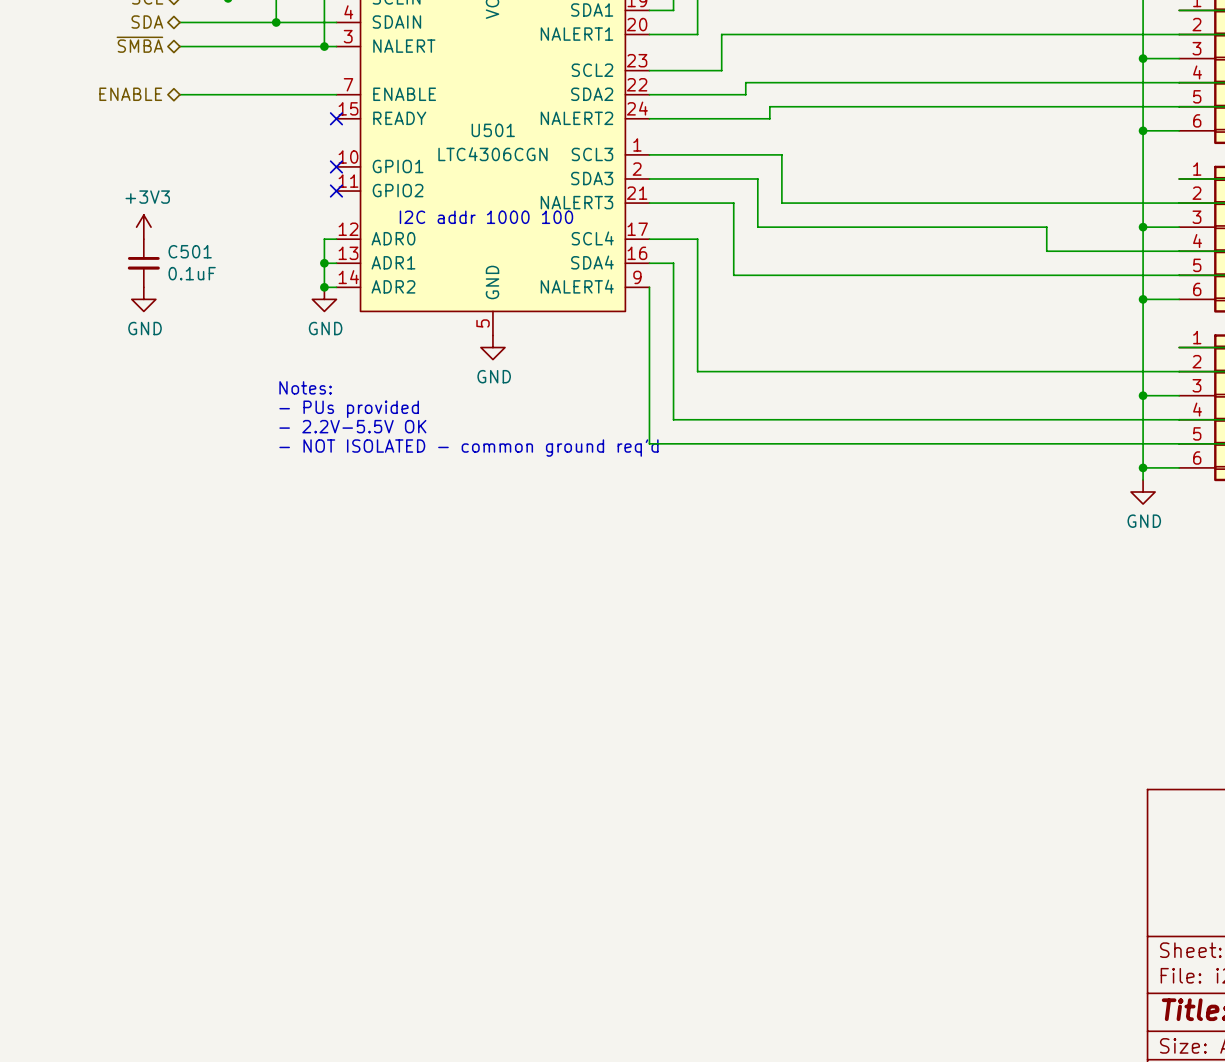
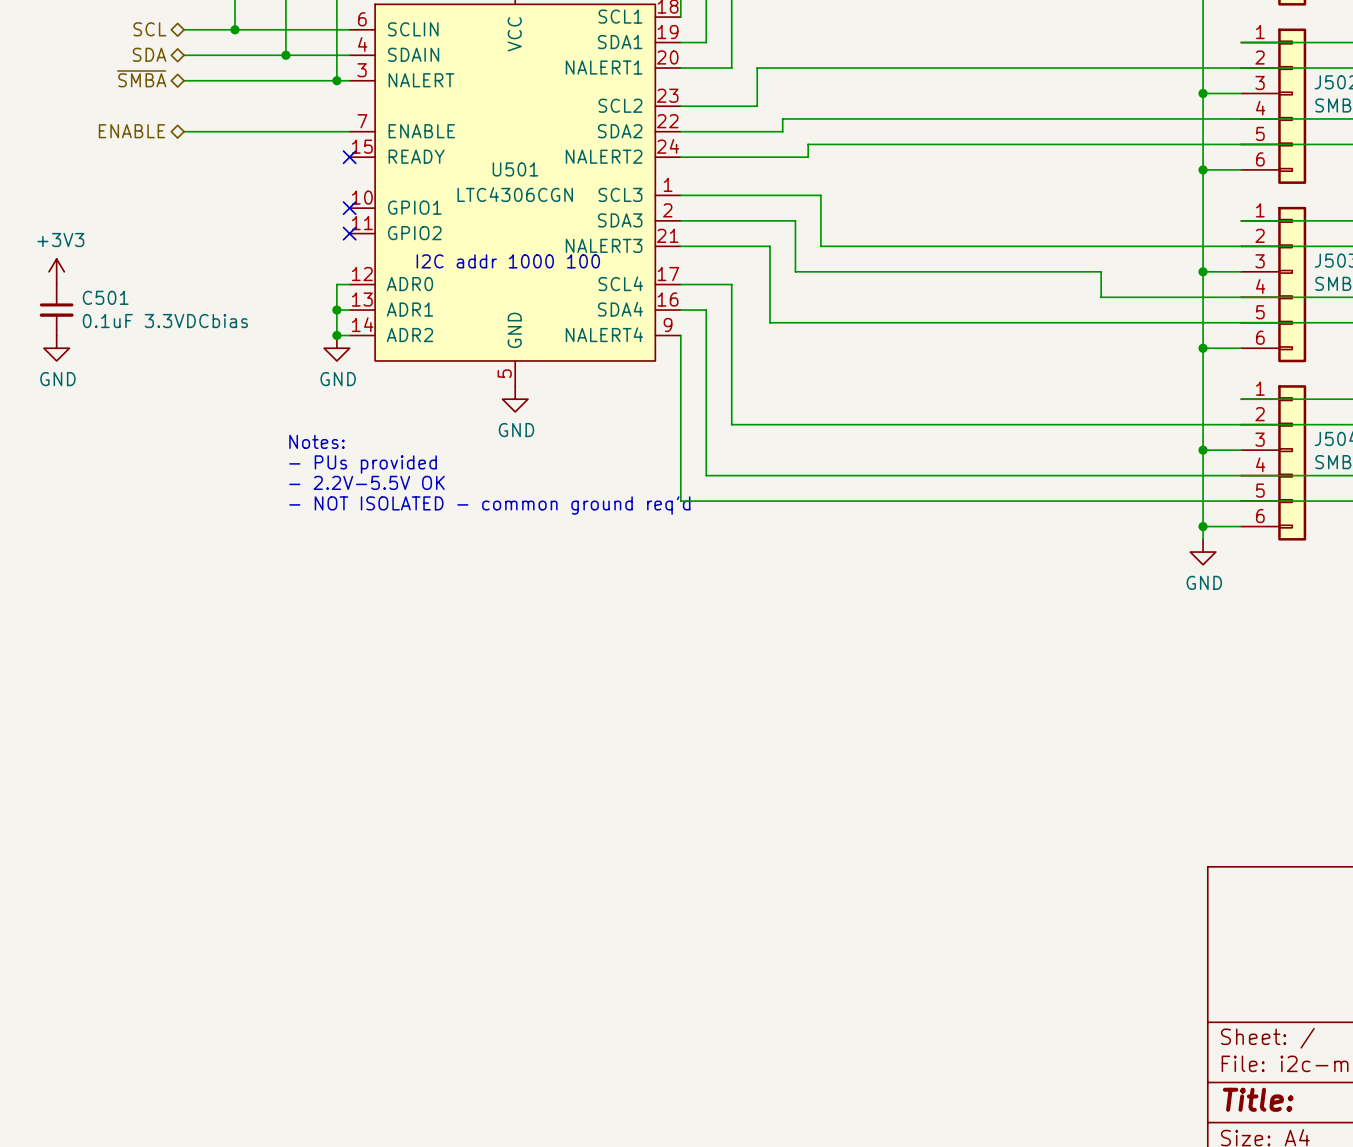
power symbol position: +3V3 (143, 227) -> +3V3 (56, 271)
C501 position: (143, 263) -> (56, 310)
C501 value: 0.1uF (192, 273) -> 0.1uF 3.3VDCbias (165, 321)
power symbol position: GND (143, 299) -> GND (56, 348)

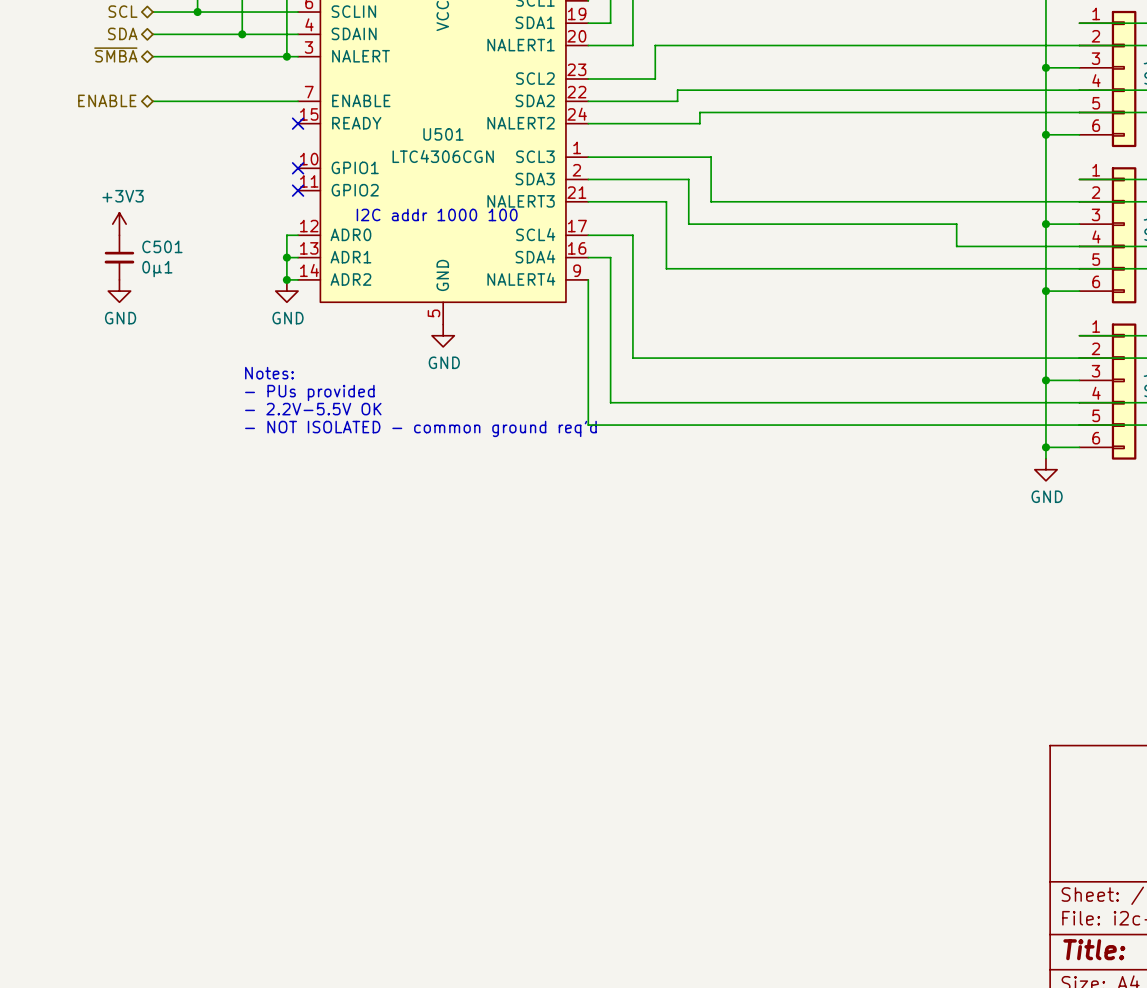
power symbol position: +3V3 (56, 271) -> +3V3 (119, 224)
C501 position: (56, 310) -> (119, 257)
C501 value: 0.1uF 3.3VDCbias (165, 321) -> 0µ1 (157, 269)
power symbol position: GND (56, 348) -> GND (119, 291)

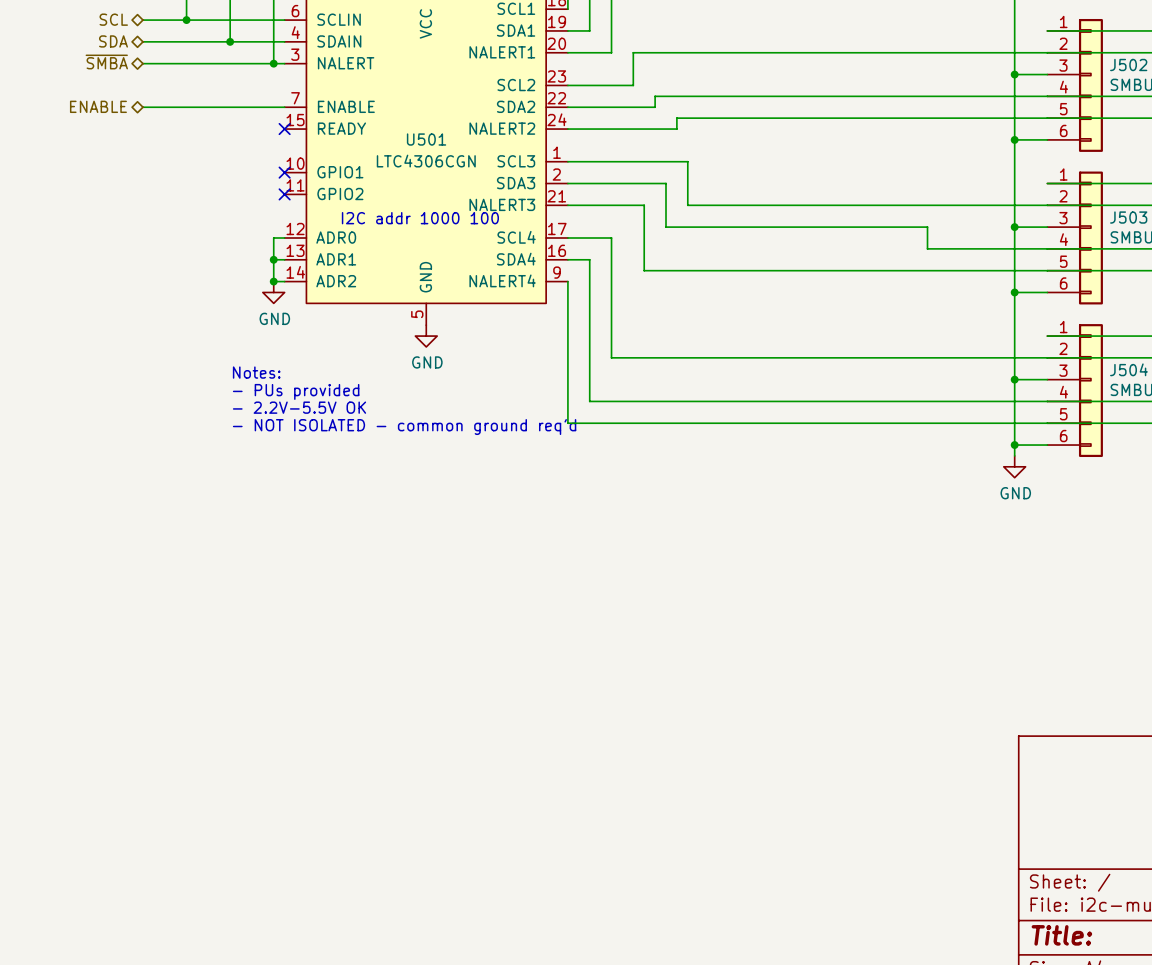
power symbol: +3V3 (119, 224) -> none
C501: 0µ1 (119, 257) -> none
power symbol: GND (119, 291) -> none

